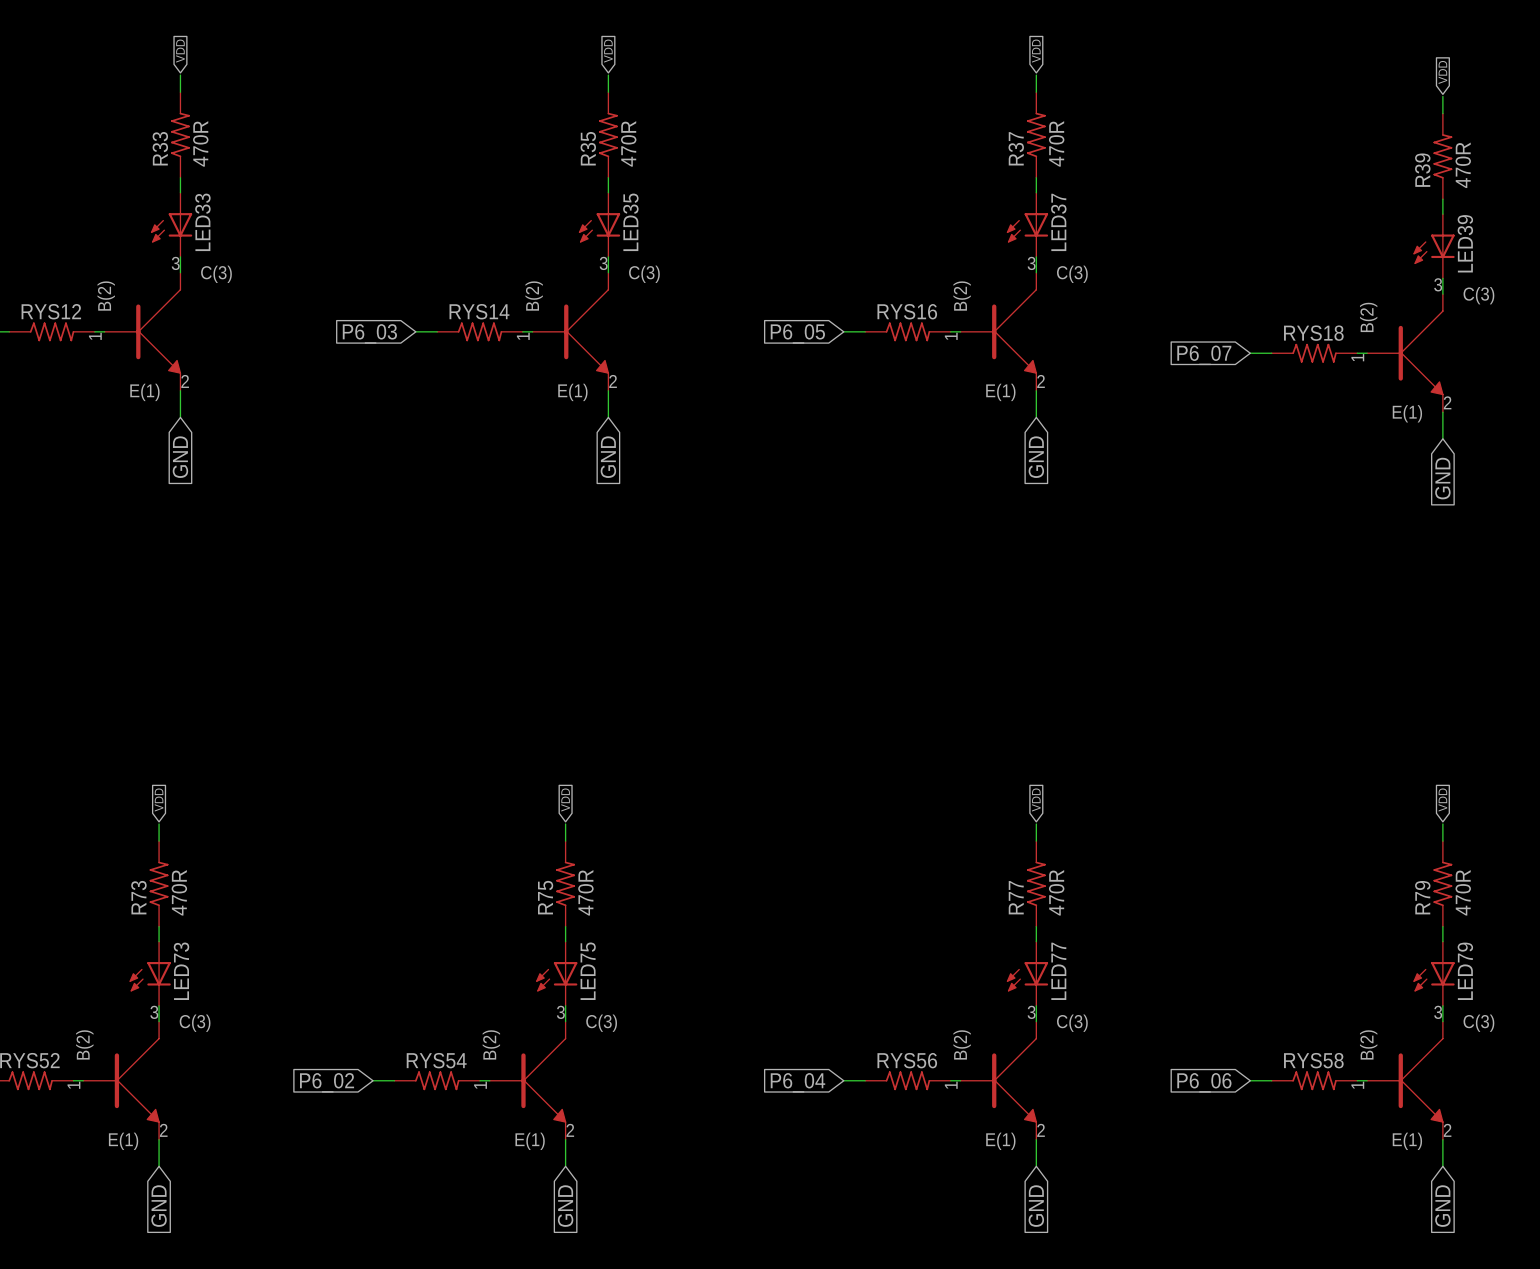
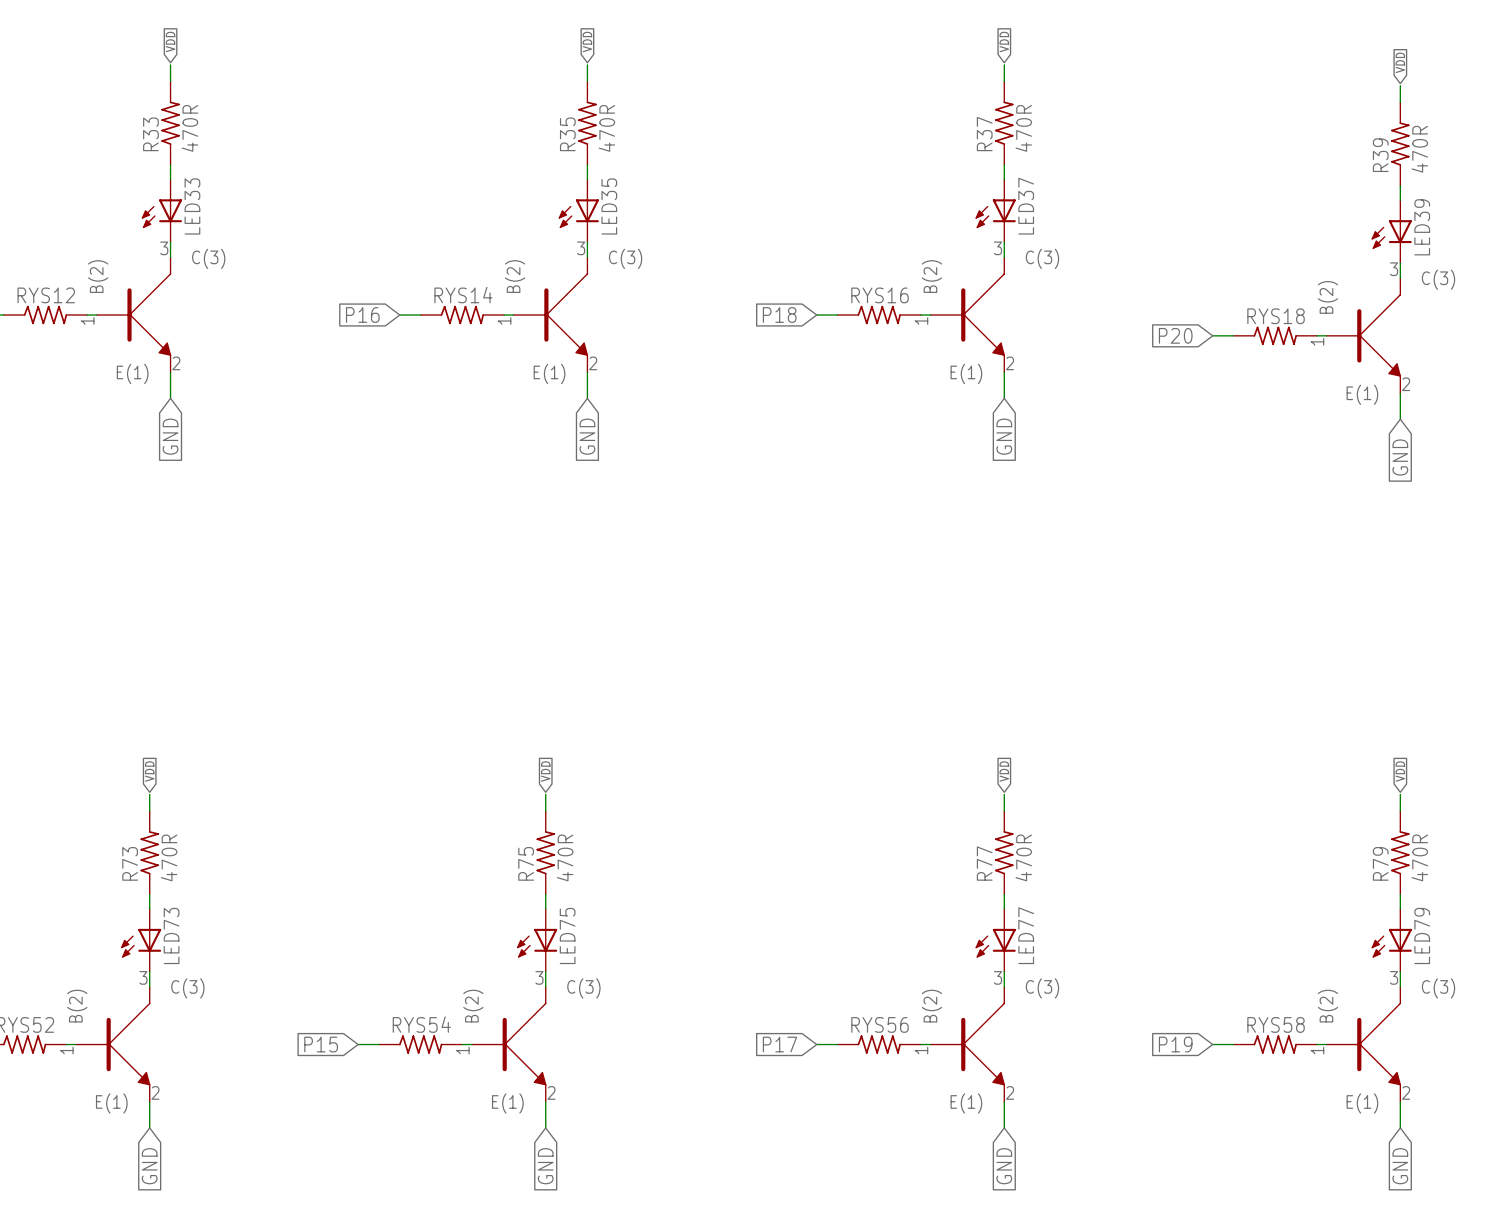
global label: P6_03 (369, 333) -> P16 (362, 315)
global label: P6_05 (797, 333) -> P18 (779, 315)
global label: P6_07 (1204, 355) -> P20 (1175, 335)
global label: P6_02 (327, 1082) -> P15 (321, 1044)
global label: P6_04 (797, 1082) -> P17 (779, 1044)
global label: P6_06 (1204, 1082) -> P19 (1175, 1044)

